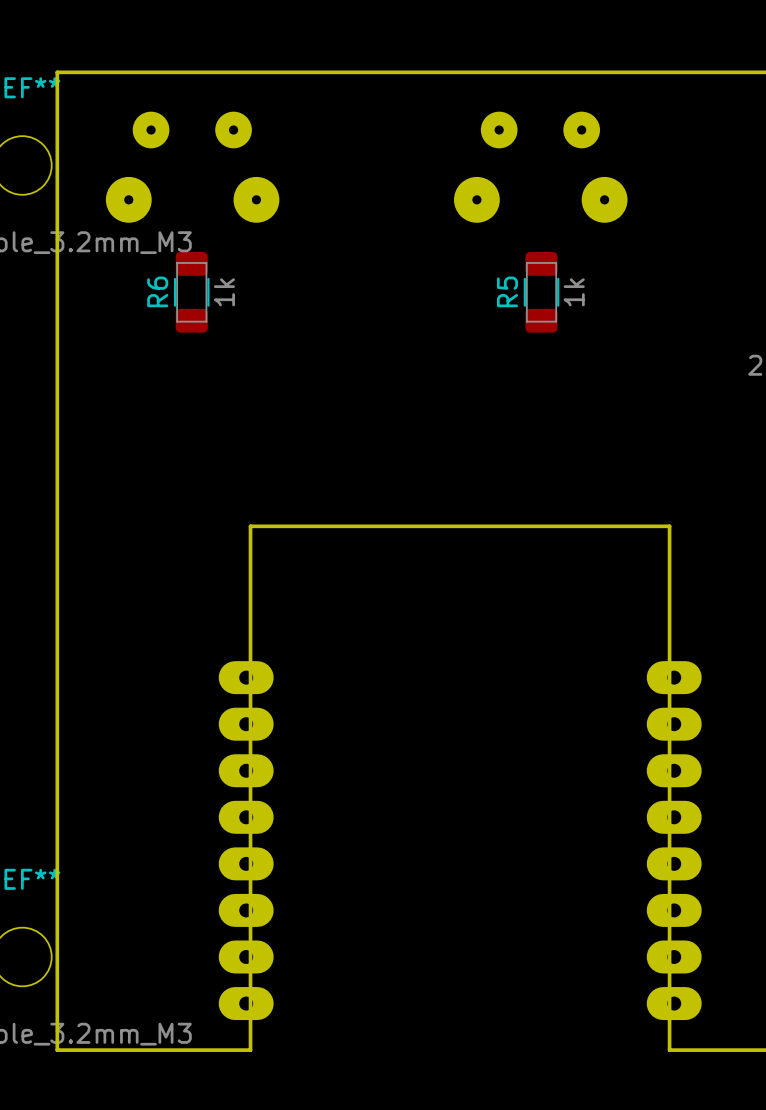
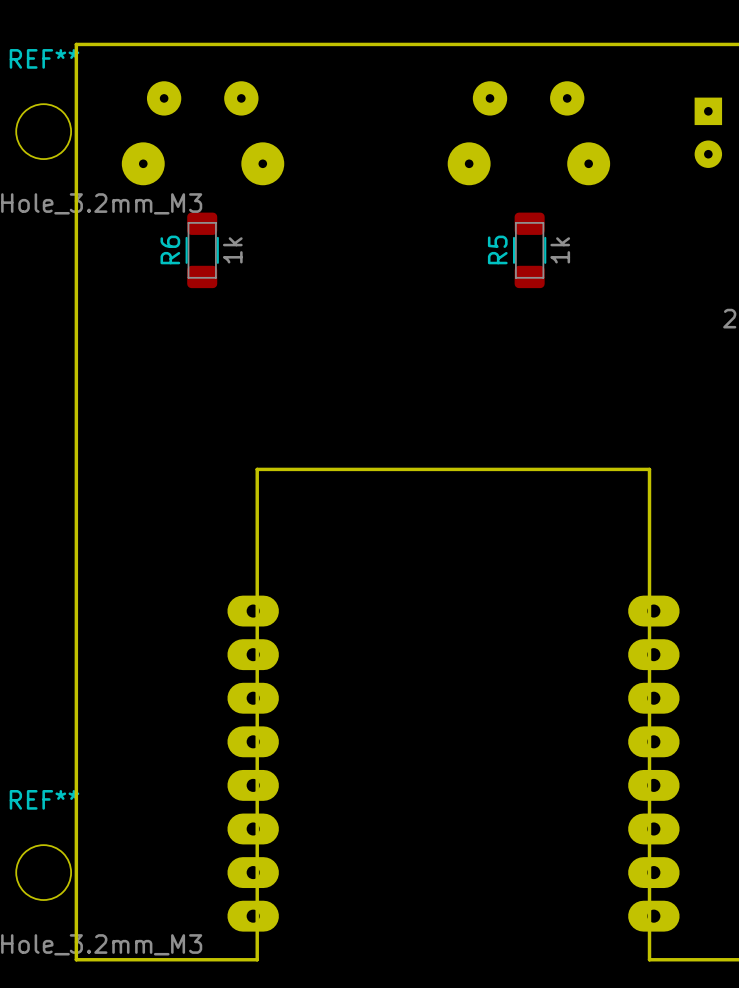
part: none -> (708, 132)

